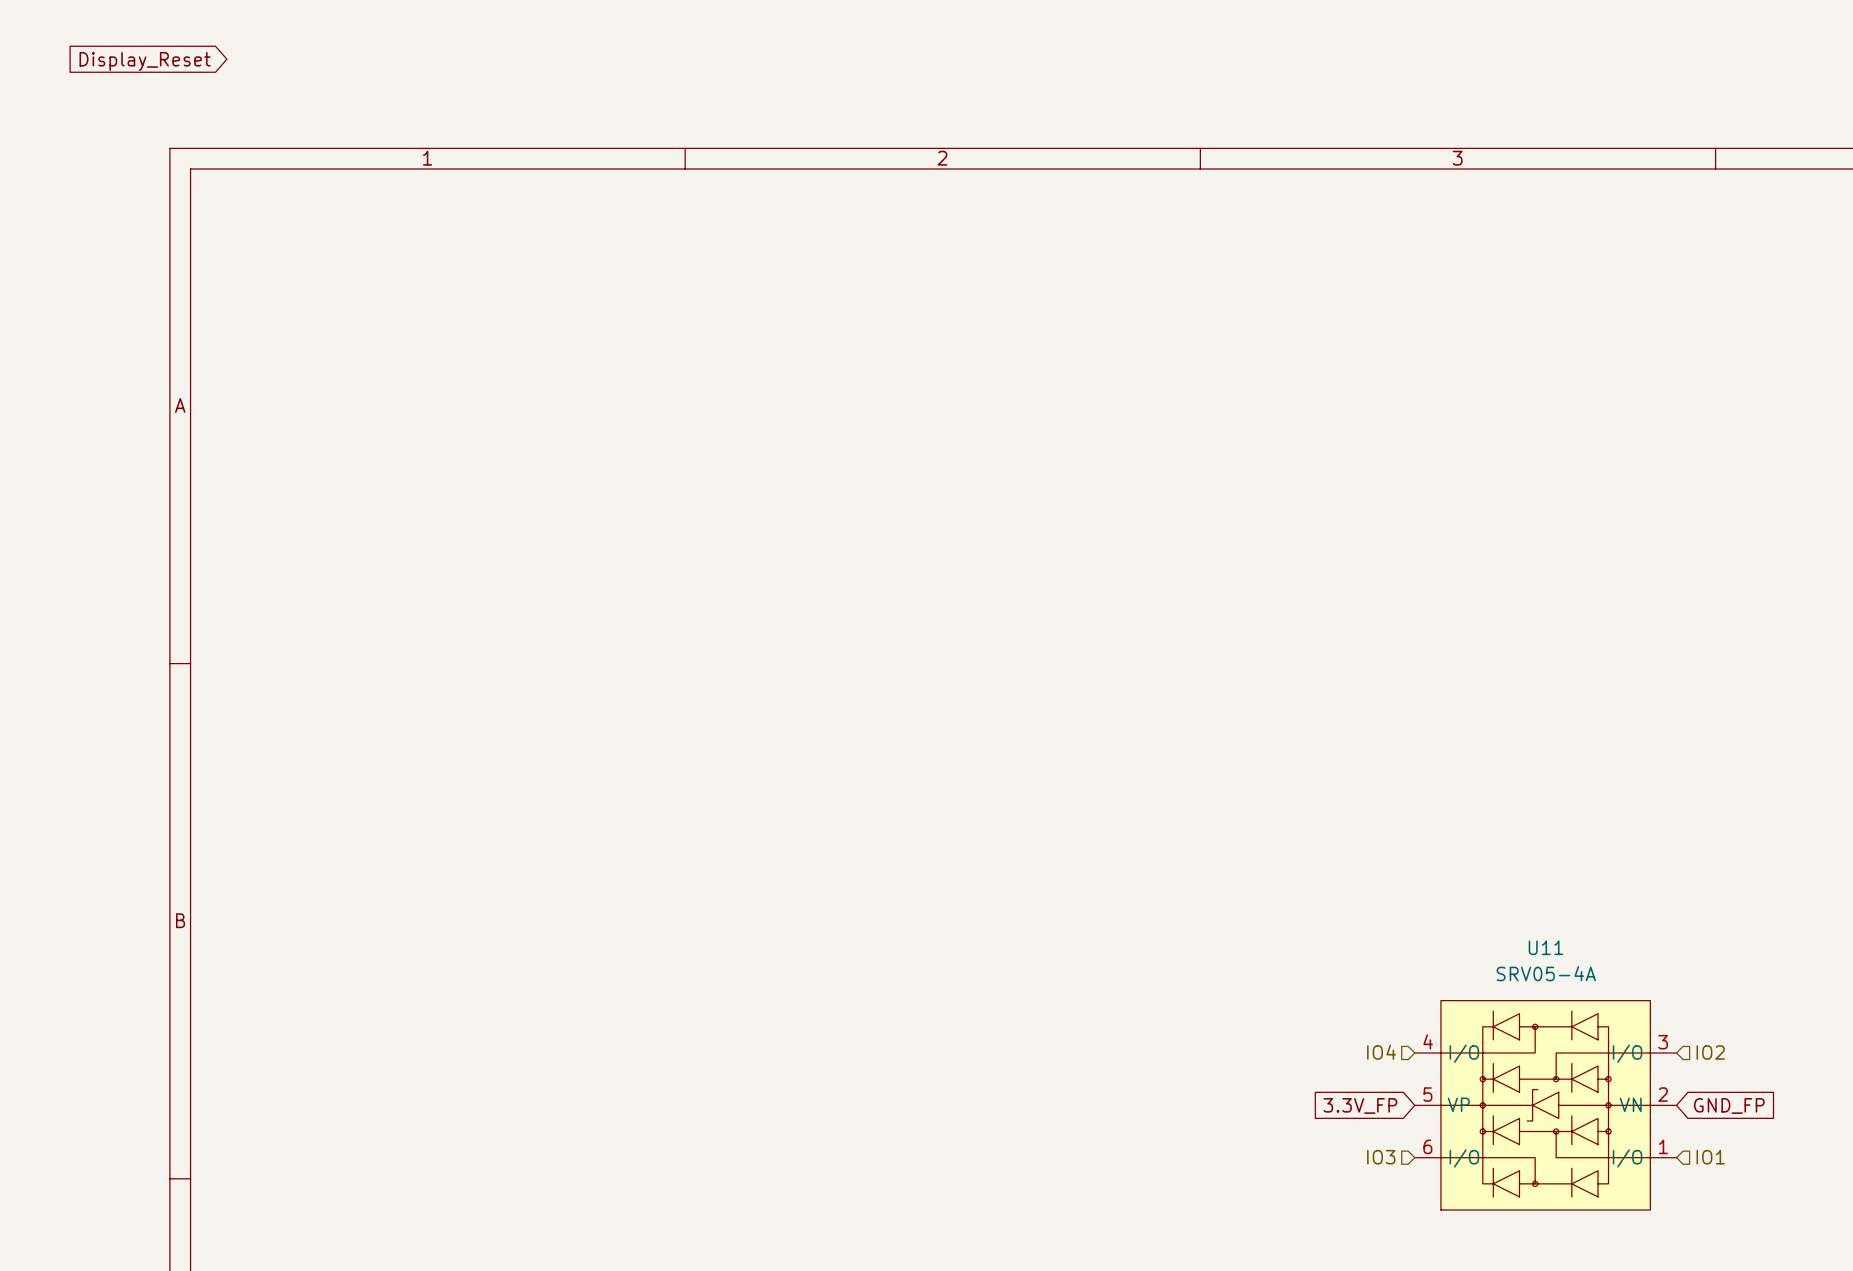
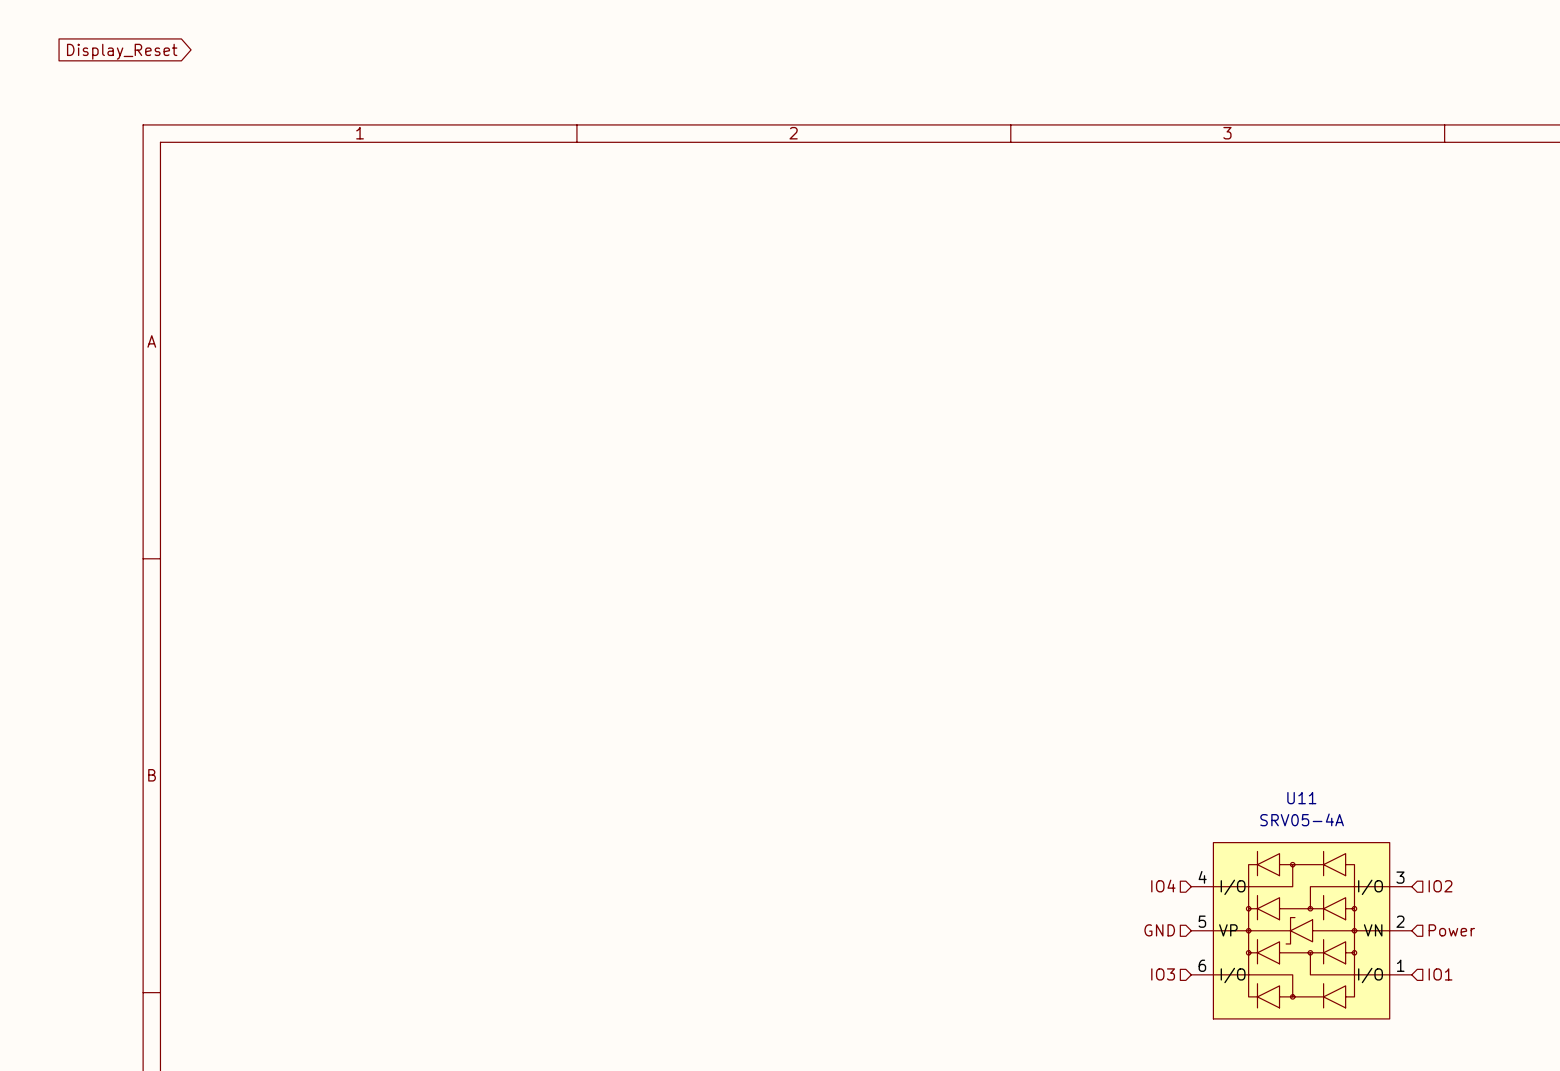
hierarchical label: none -> GND (1159, 930)
hierarchical label: none -> Power (1451, 930)
global label: 3.3V_FP (1360, 1105) -> none
global label: GND_FP (1729, 1105) -> none

